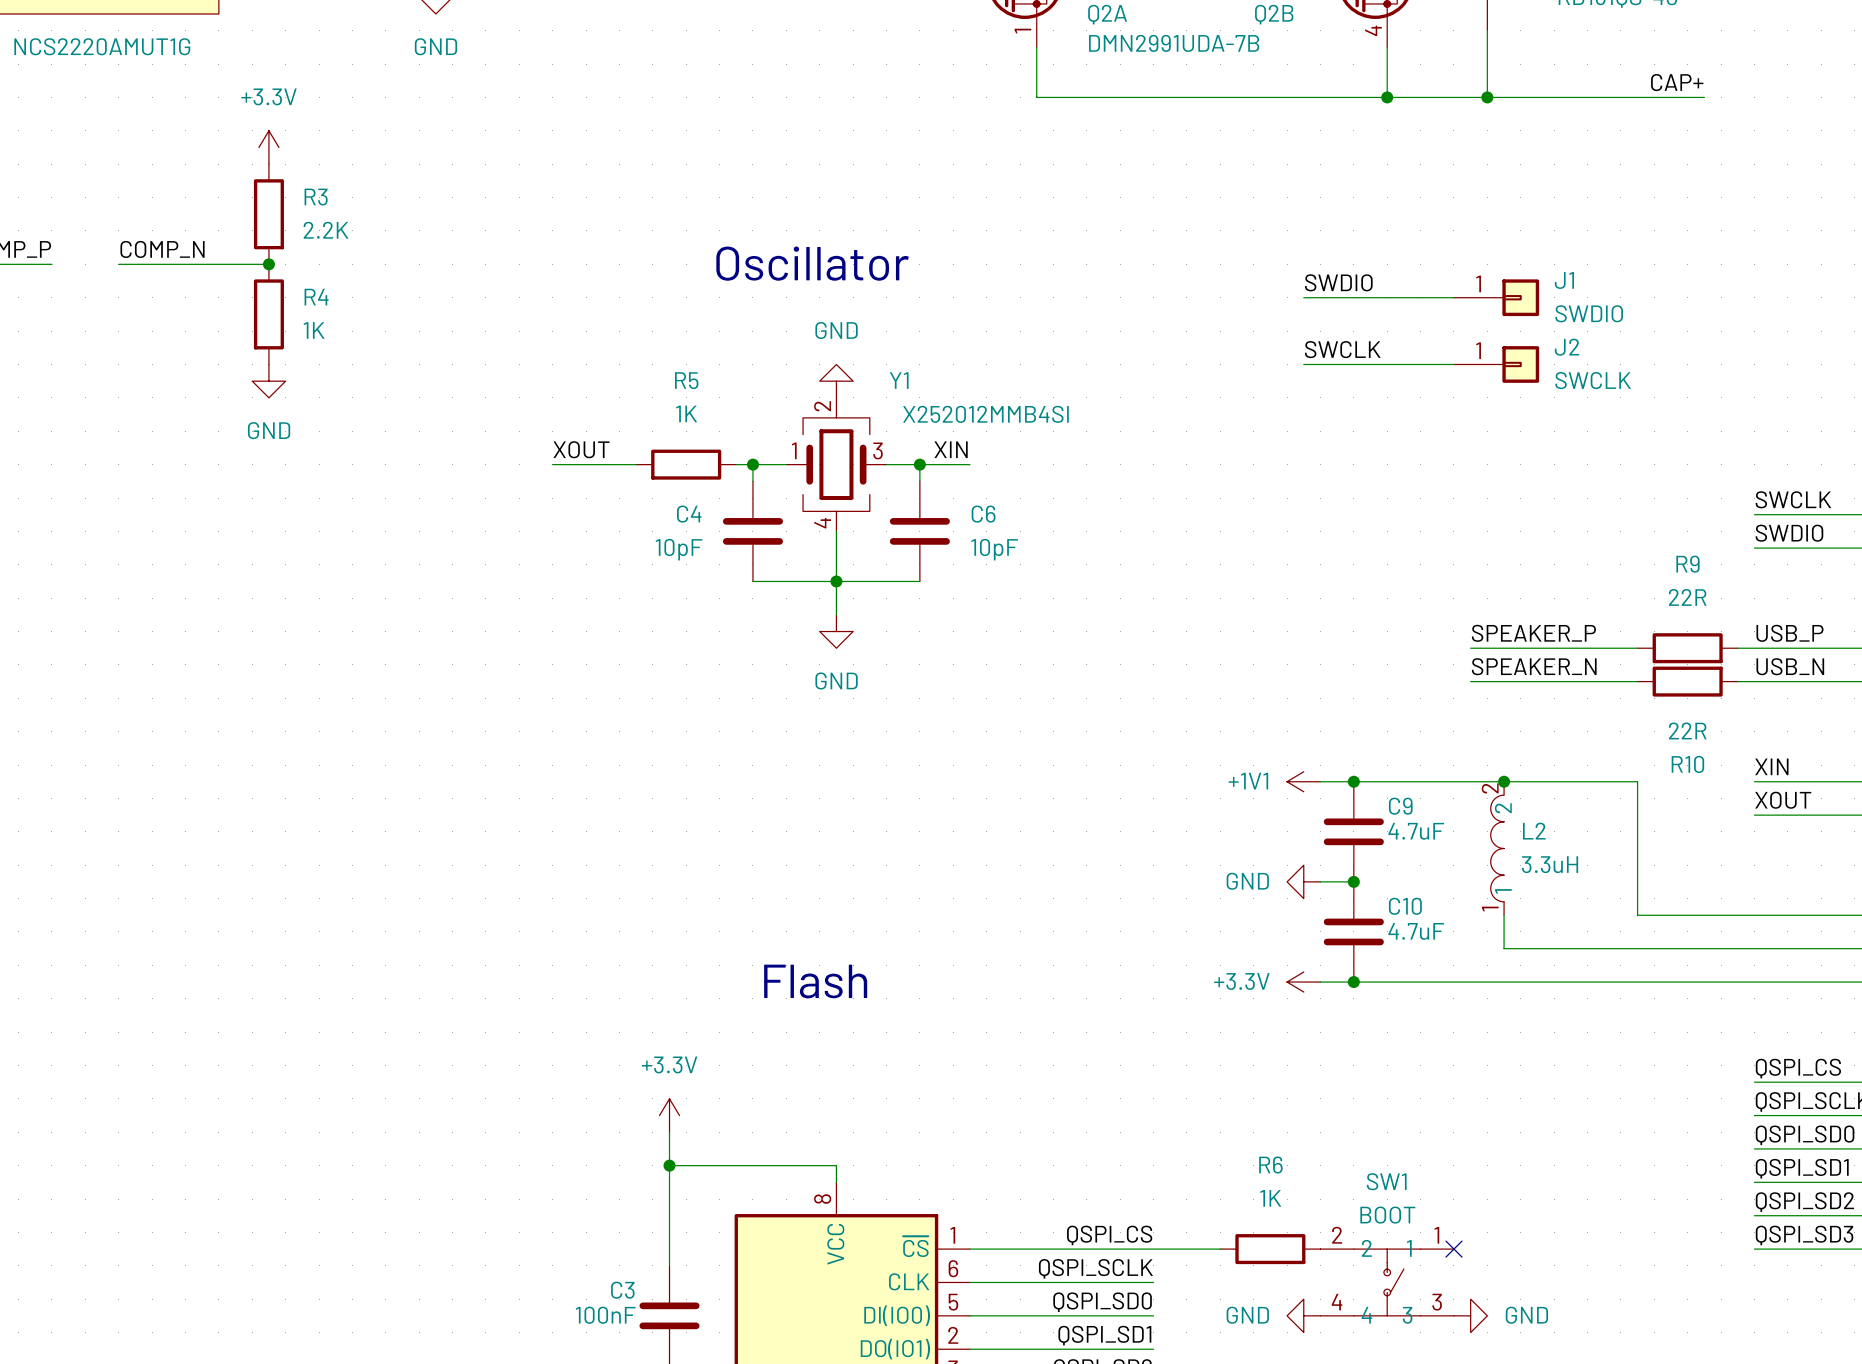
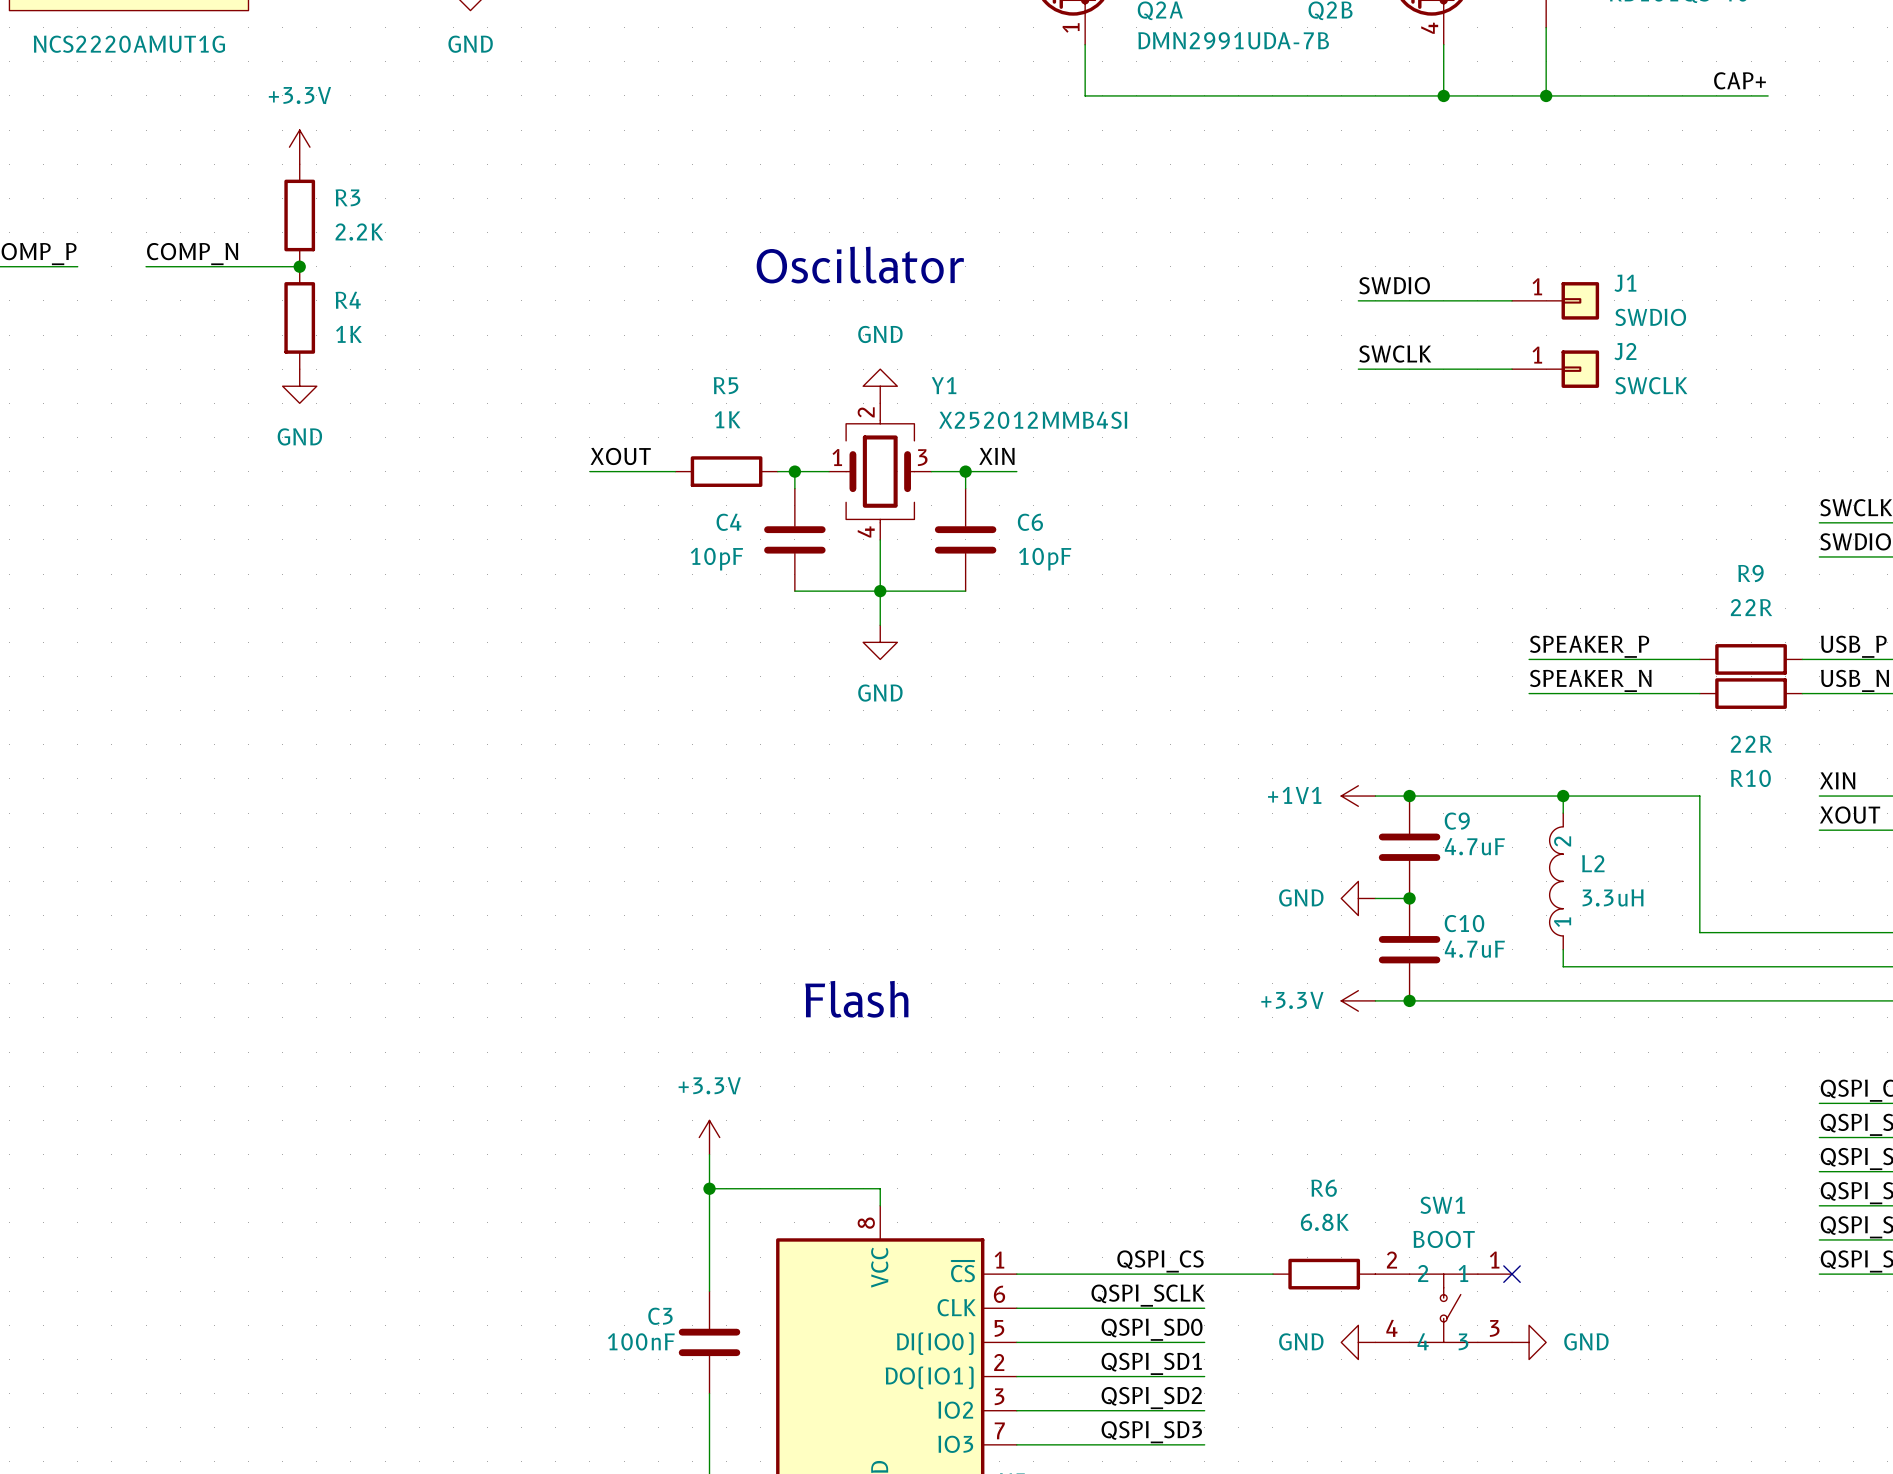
L2 pin number: 2 (1490, 788) -> none
L2 position: (1497, 848) -> (1556, 881)
L2 pin number: 1 (1490, 909) -> none
R6 value: 1K (1270, 1198) -> 6.8K (1324, 1222)

